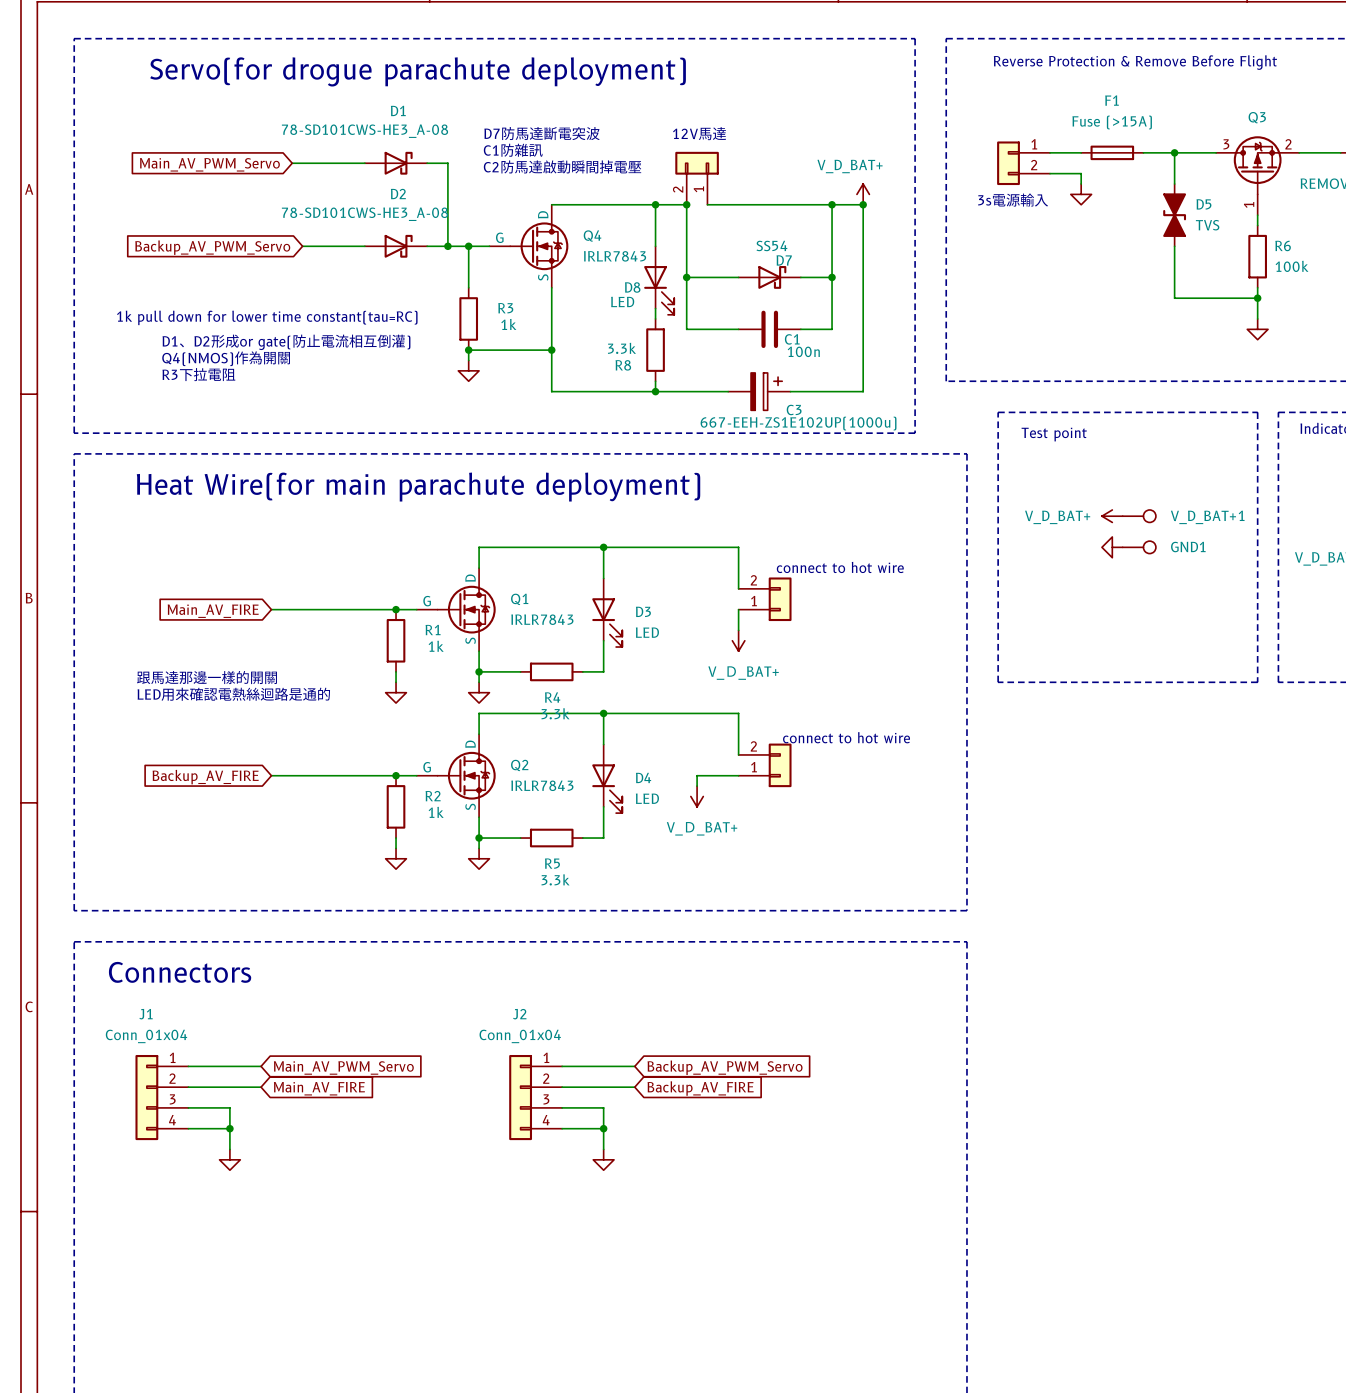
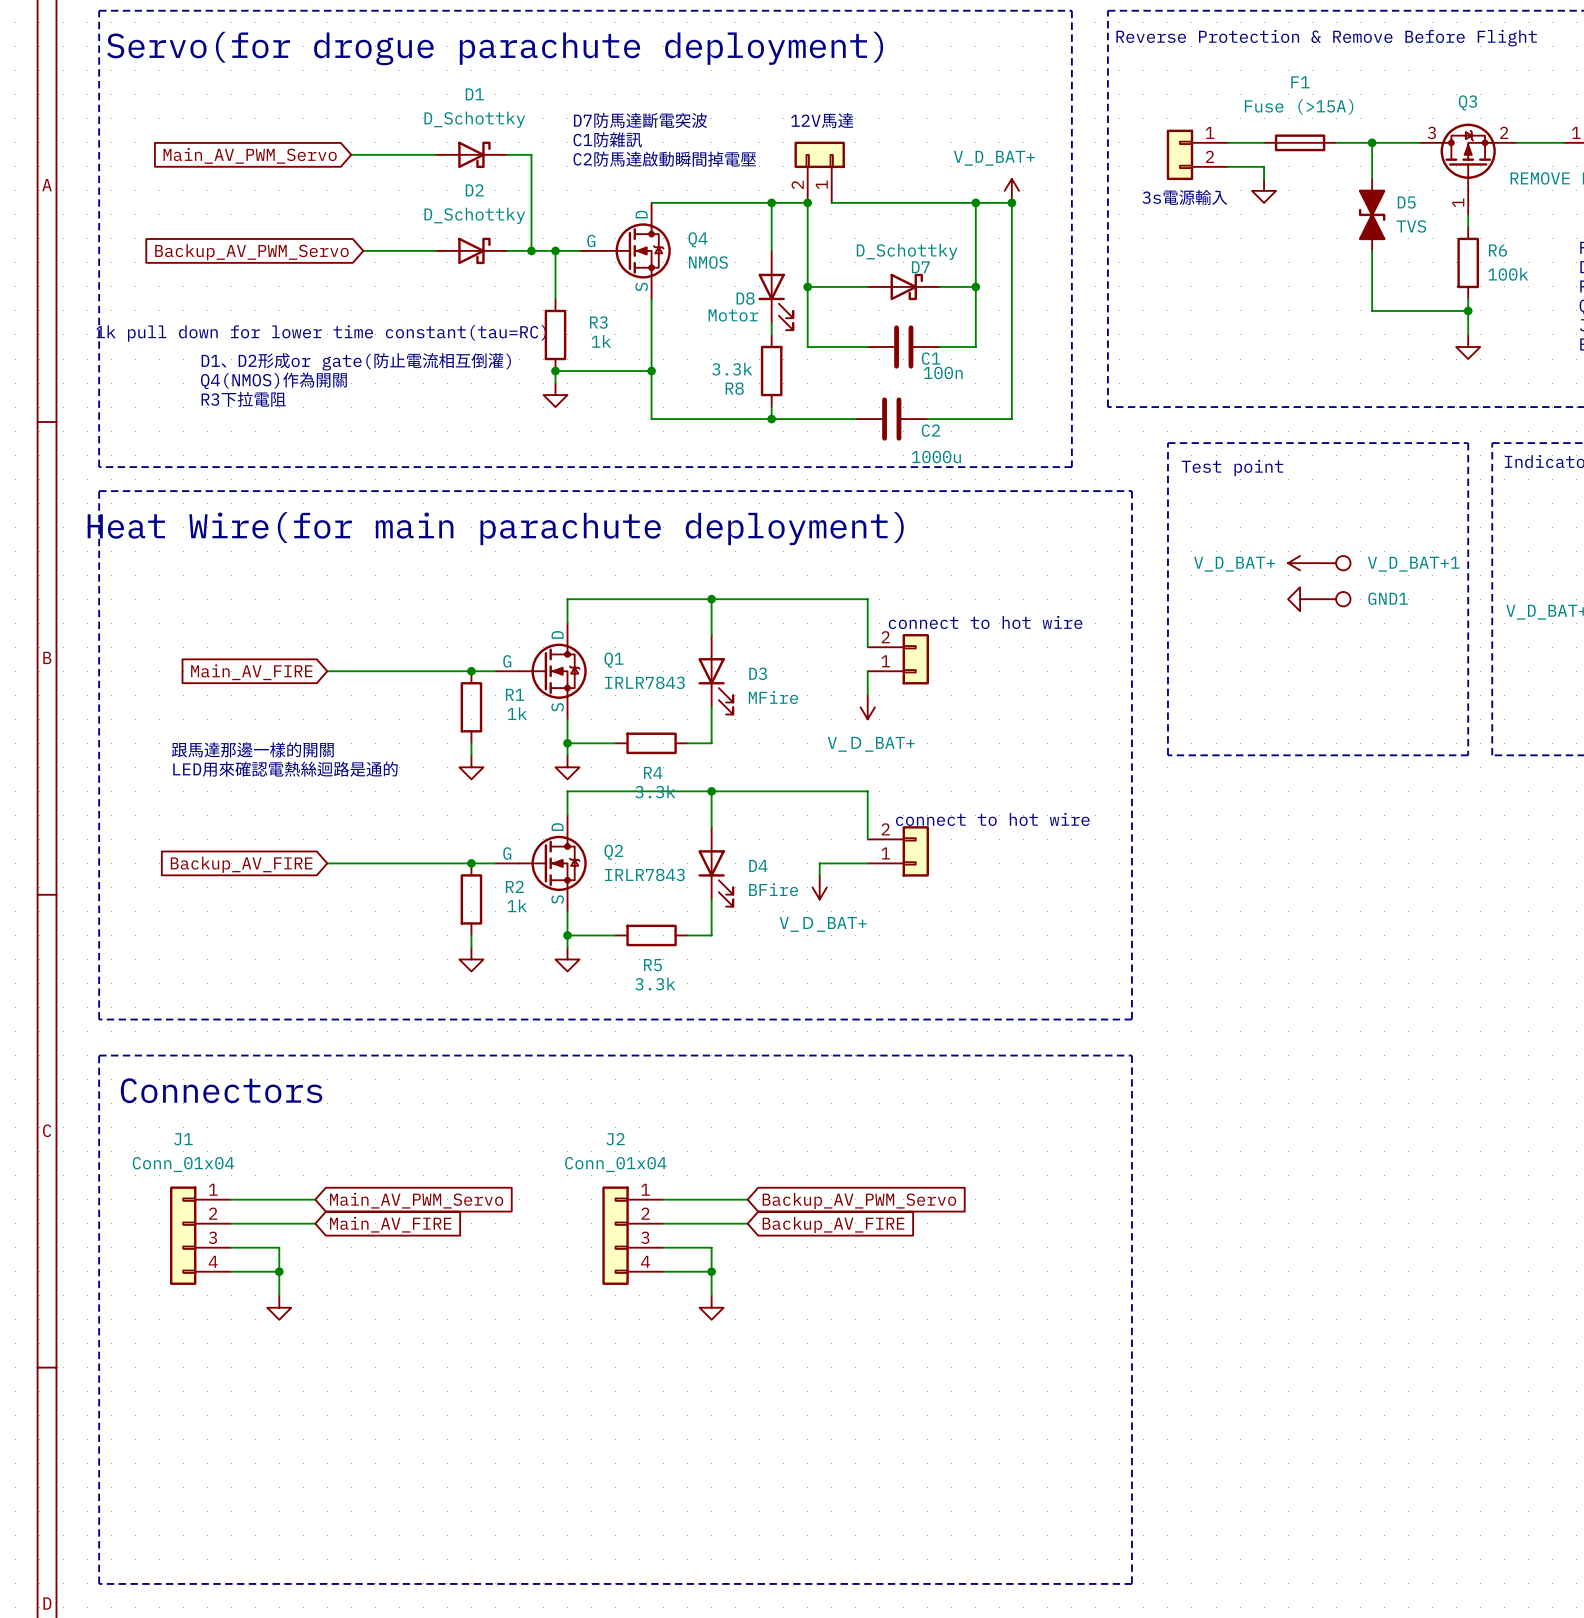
D1 value: 78-SD101CWS-HE3_A-08 (364, 131) -> D_Schottky (474, 119)
D2 value: 78-SD101CWS-HE3_A-08 (364, 214) -> D_Schottky (474, 215)
D7 value: SS54 (771, 245) -> D_Schottky (907, 251)
Q4 value: IRLR7843 (615, 256) -> NMOS (708, 262)
D8 value: LED (622, 301) -> Motor (733, 315)
C3: 667-EEH-ZS1E102UP(1000u) (759, 391) -> none
C2: none -> 1000u (891, 419)
D3 value: LED (647, 632) -> MFire (773, 697)
D4 value: LED (647, 798) -> BFire (773, 889)

